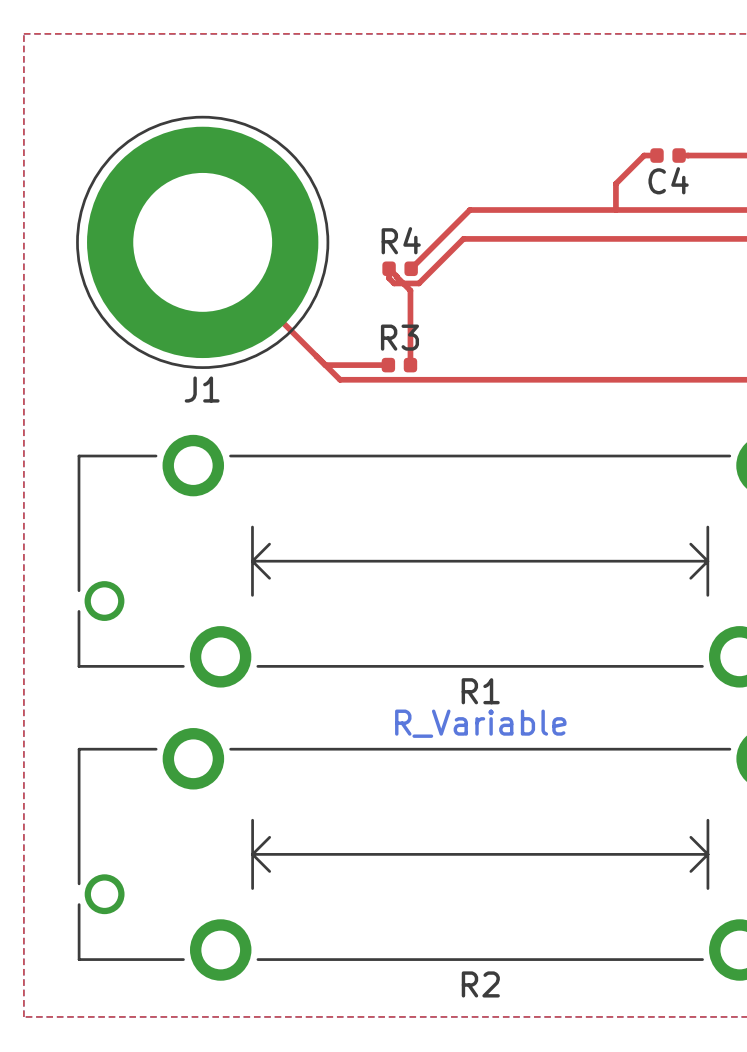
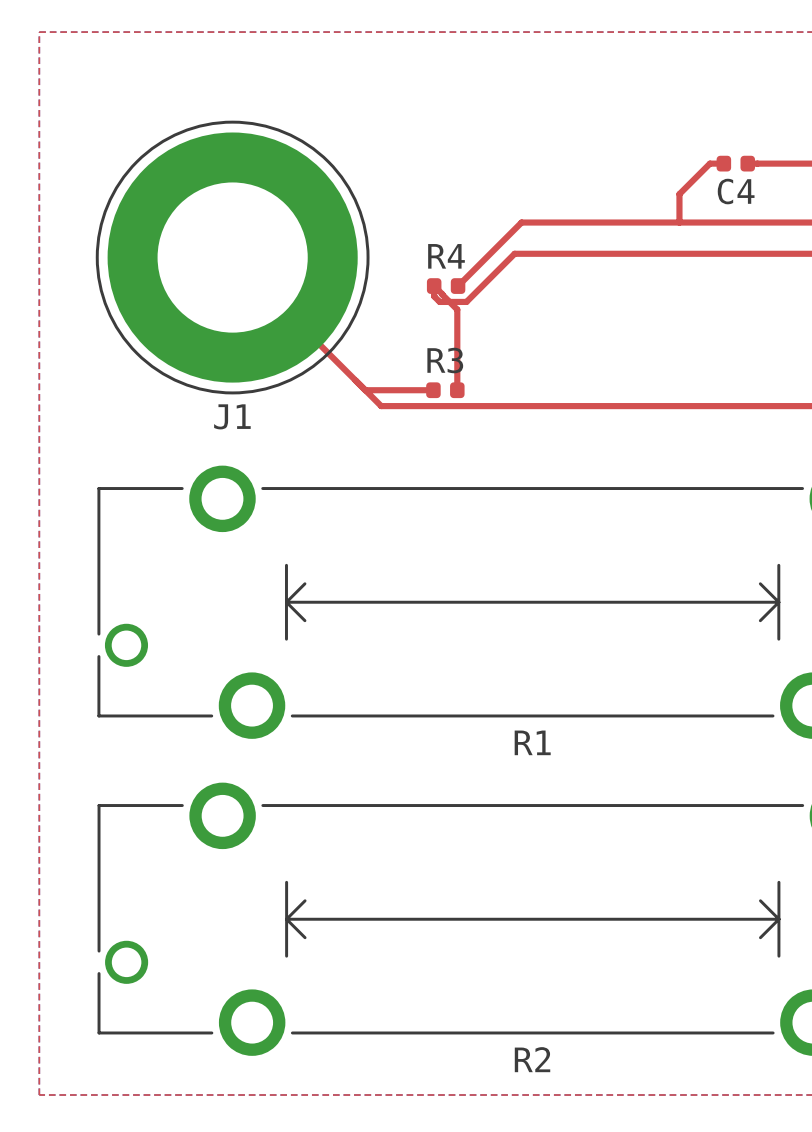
R2 value: R_Variable (480, 723) -> none

